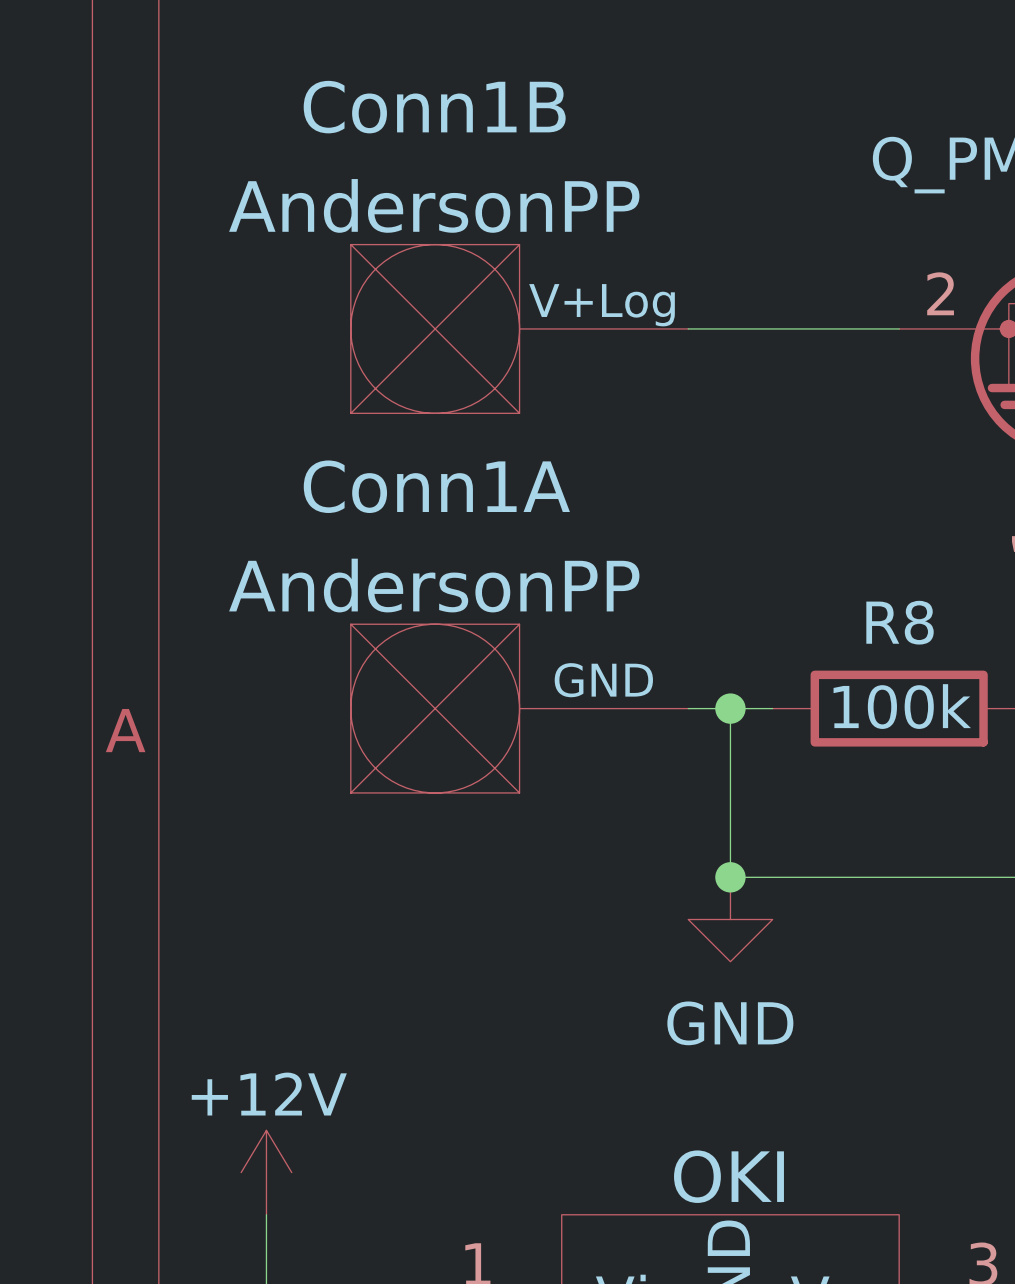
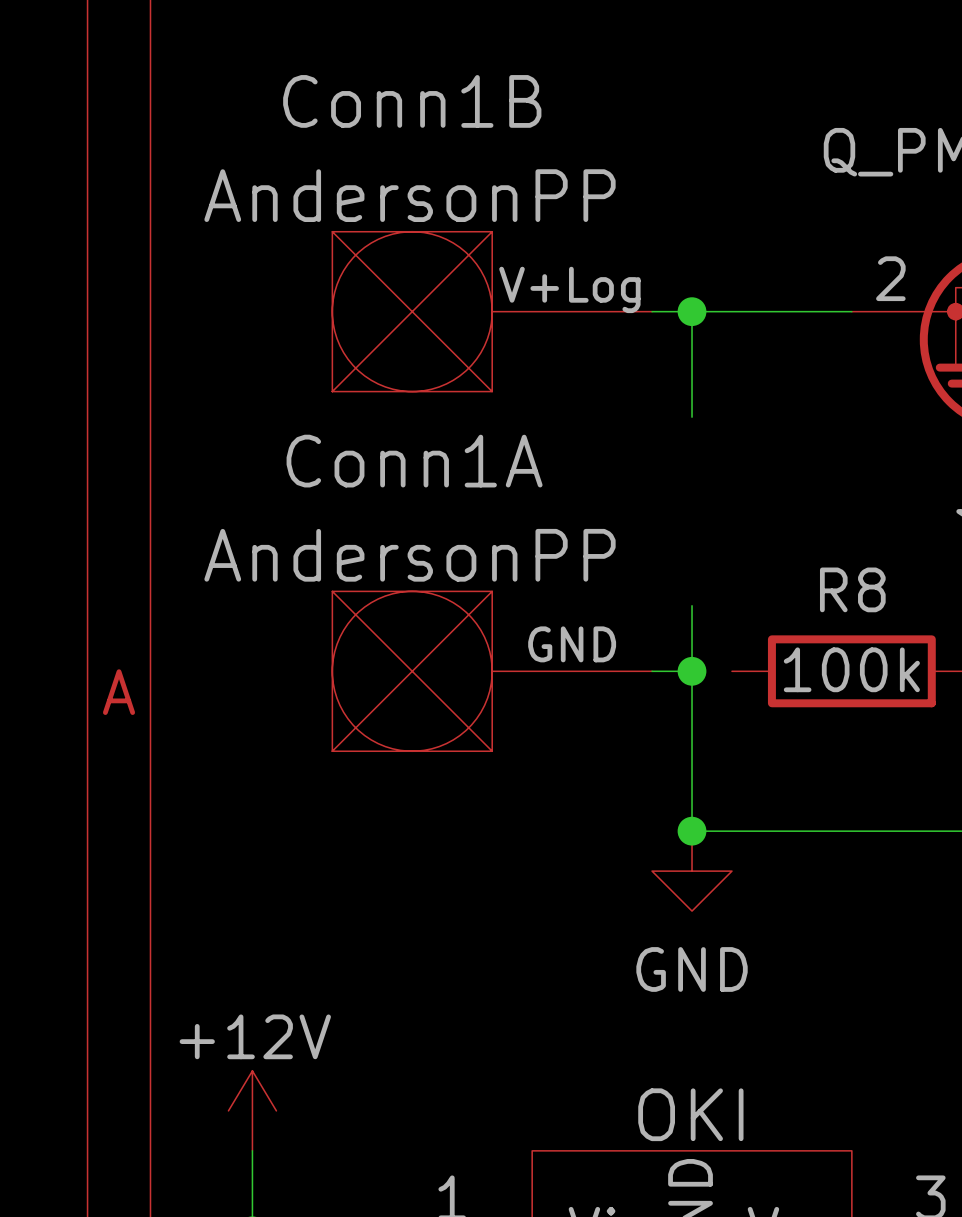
wire: none -> (692, 311) (692, 417)
junction: none -> (692, 311)
wire: (730, 708) (772, 708) -> (692, 671) (692, 605)

